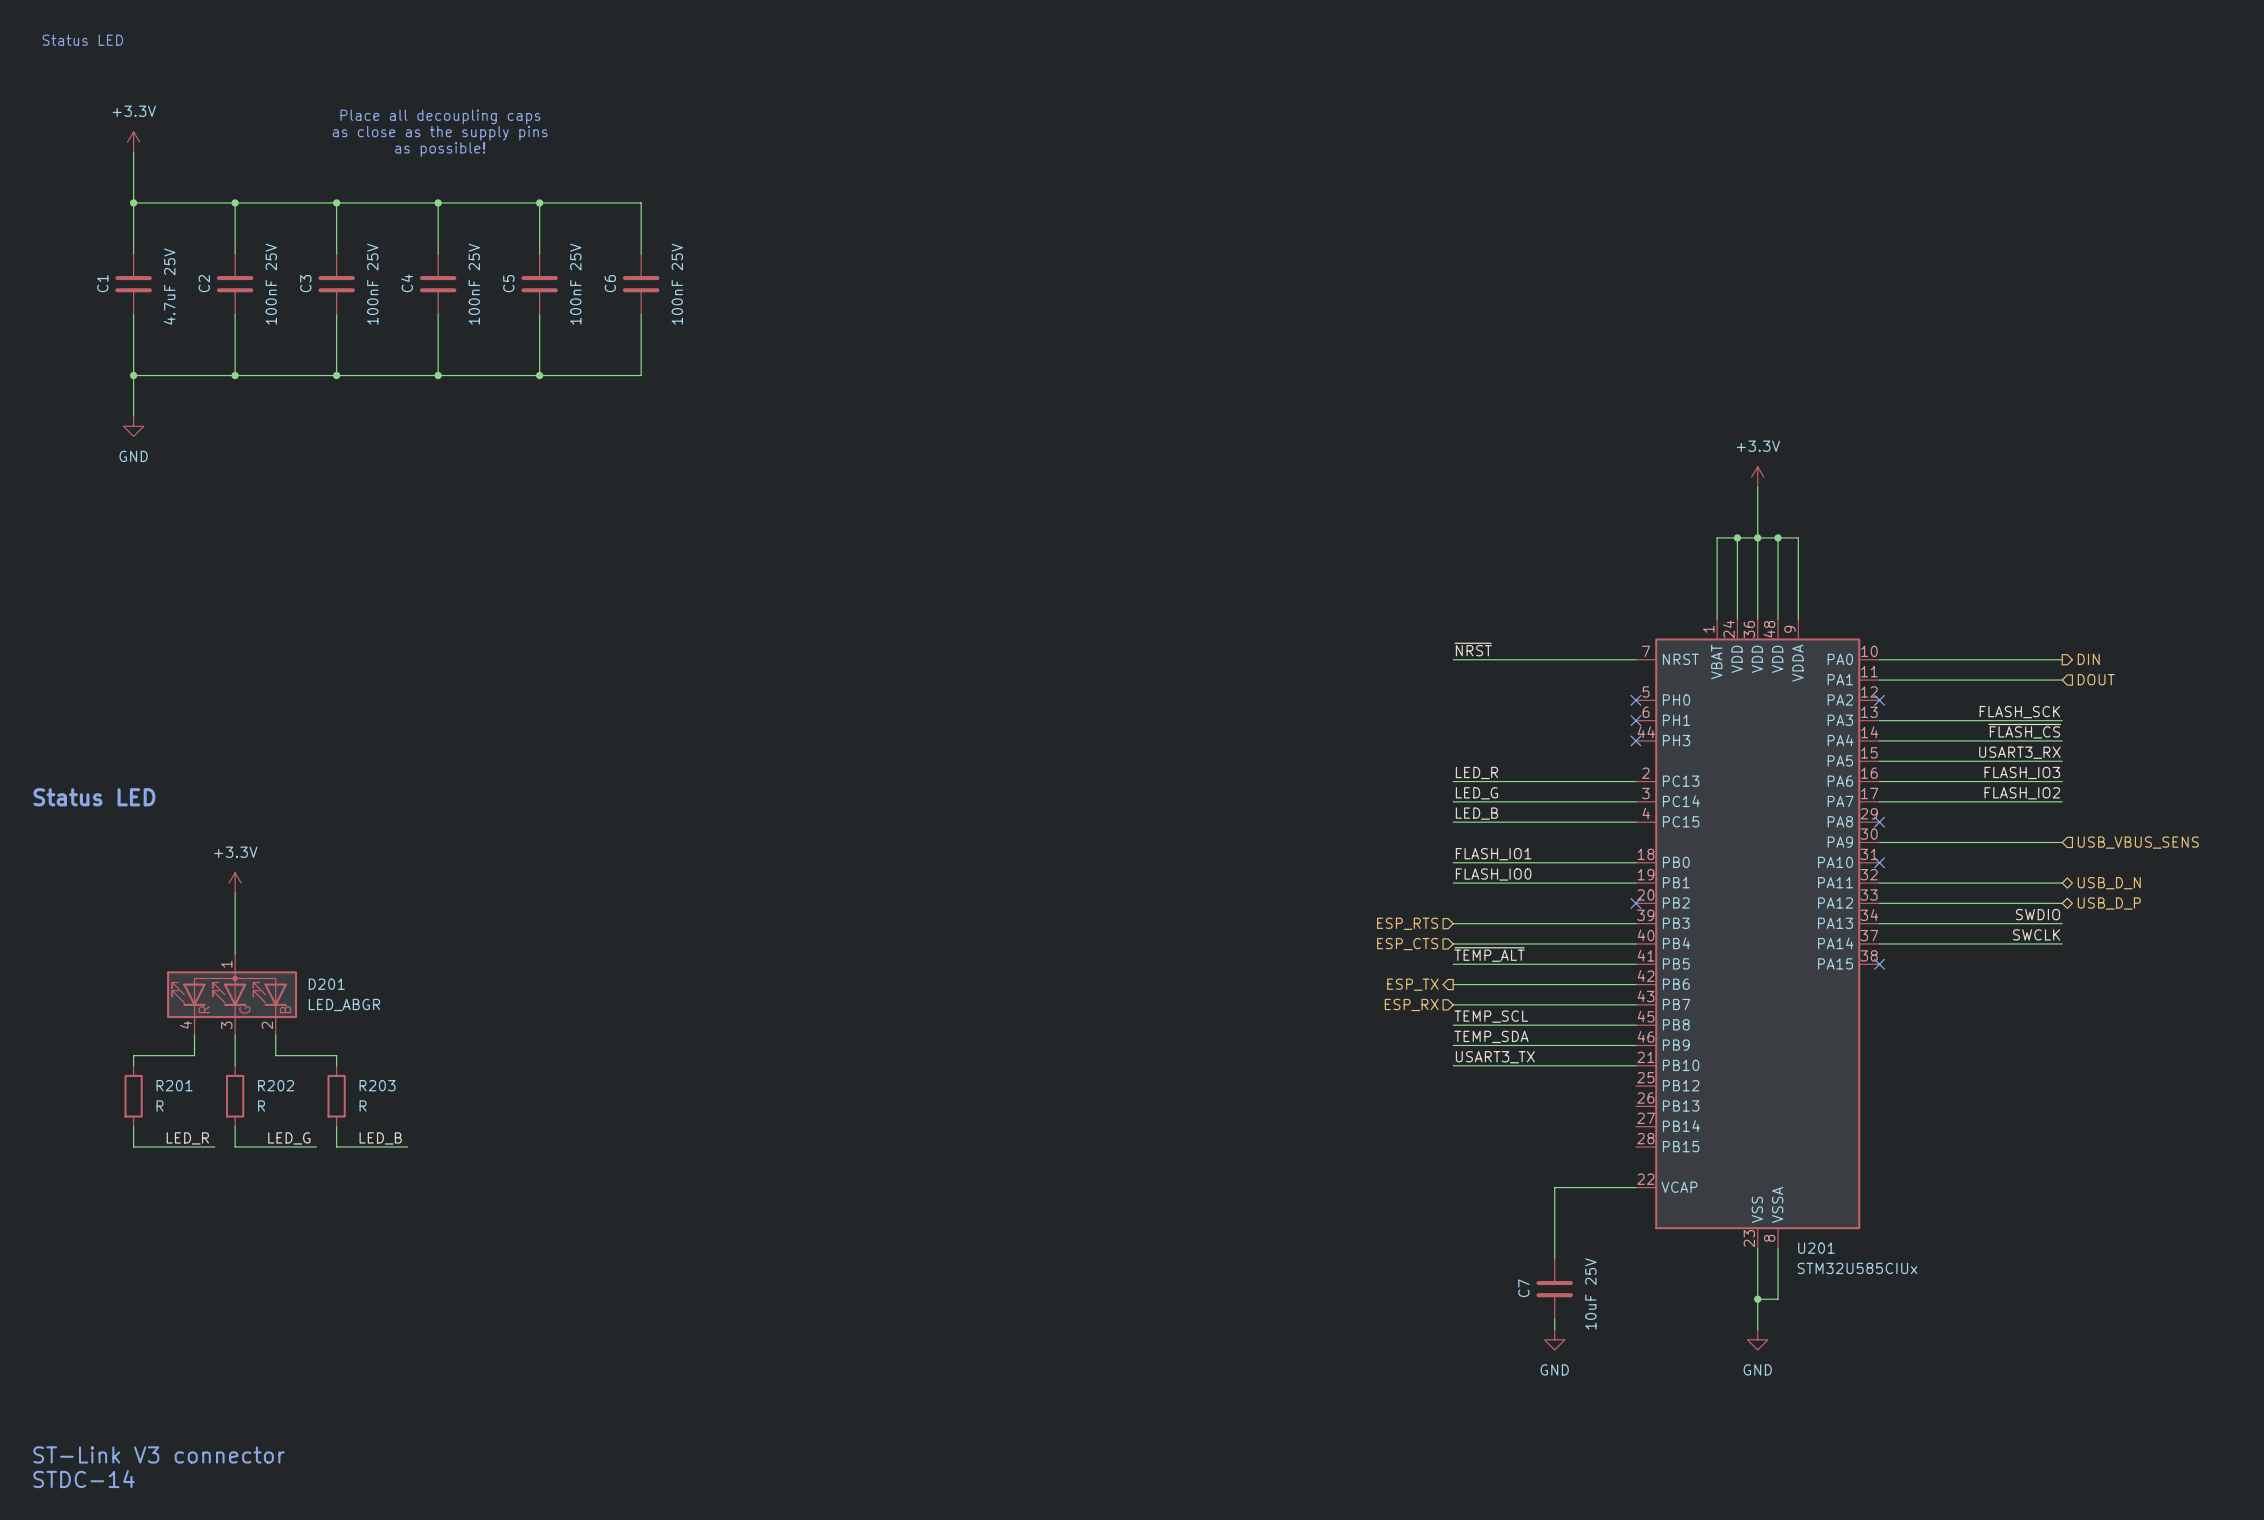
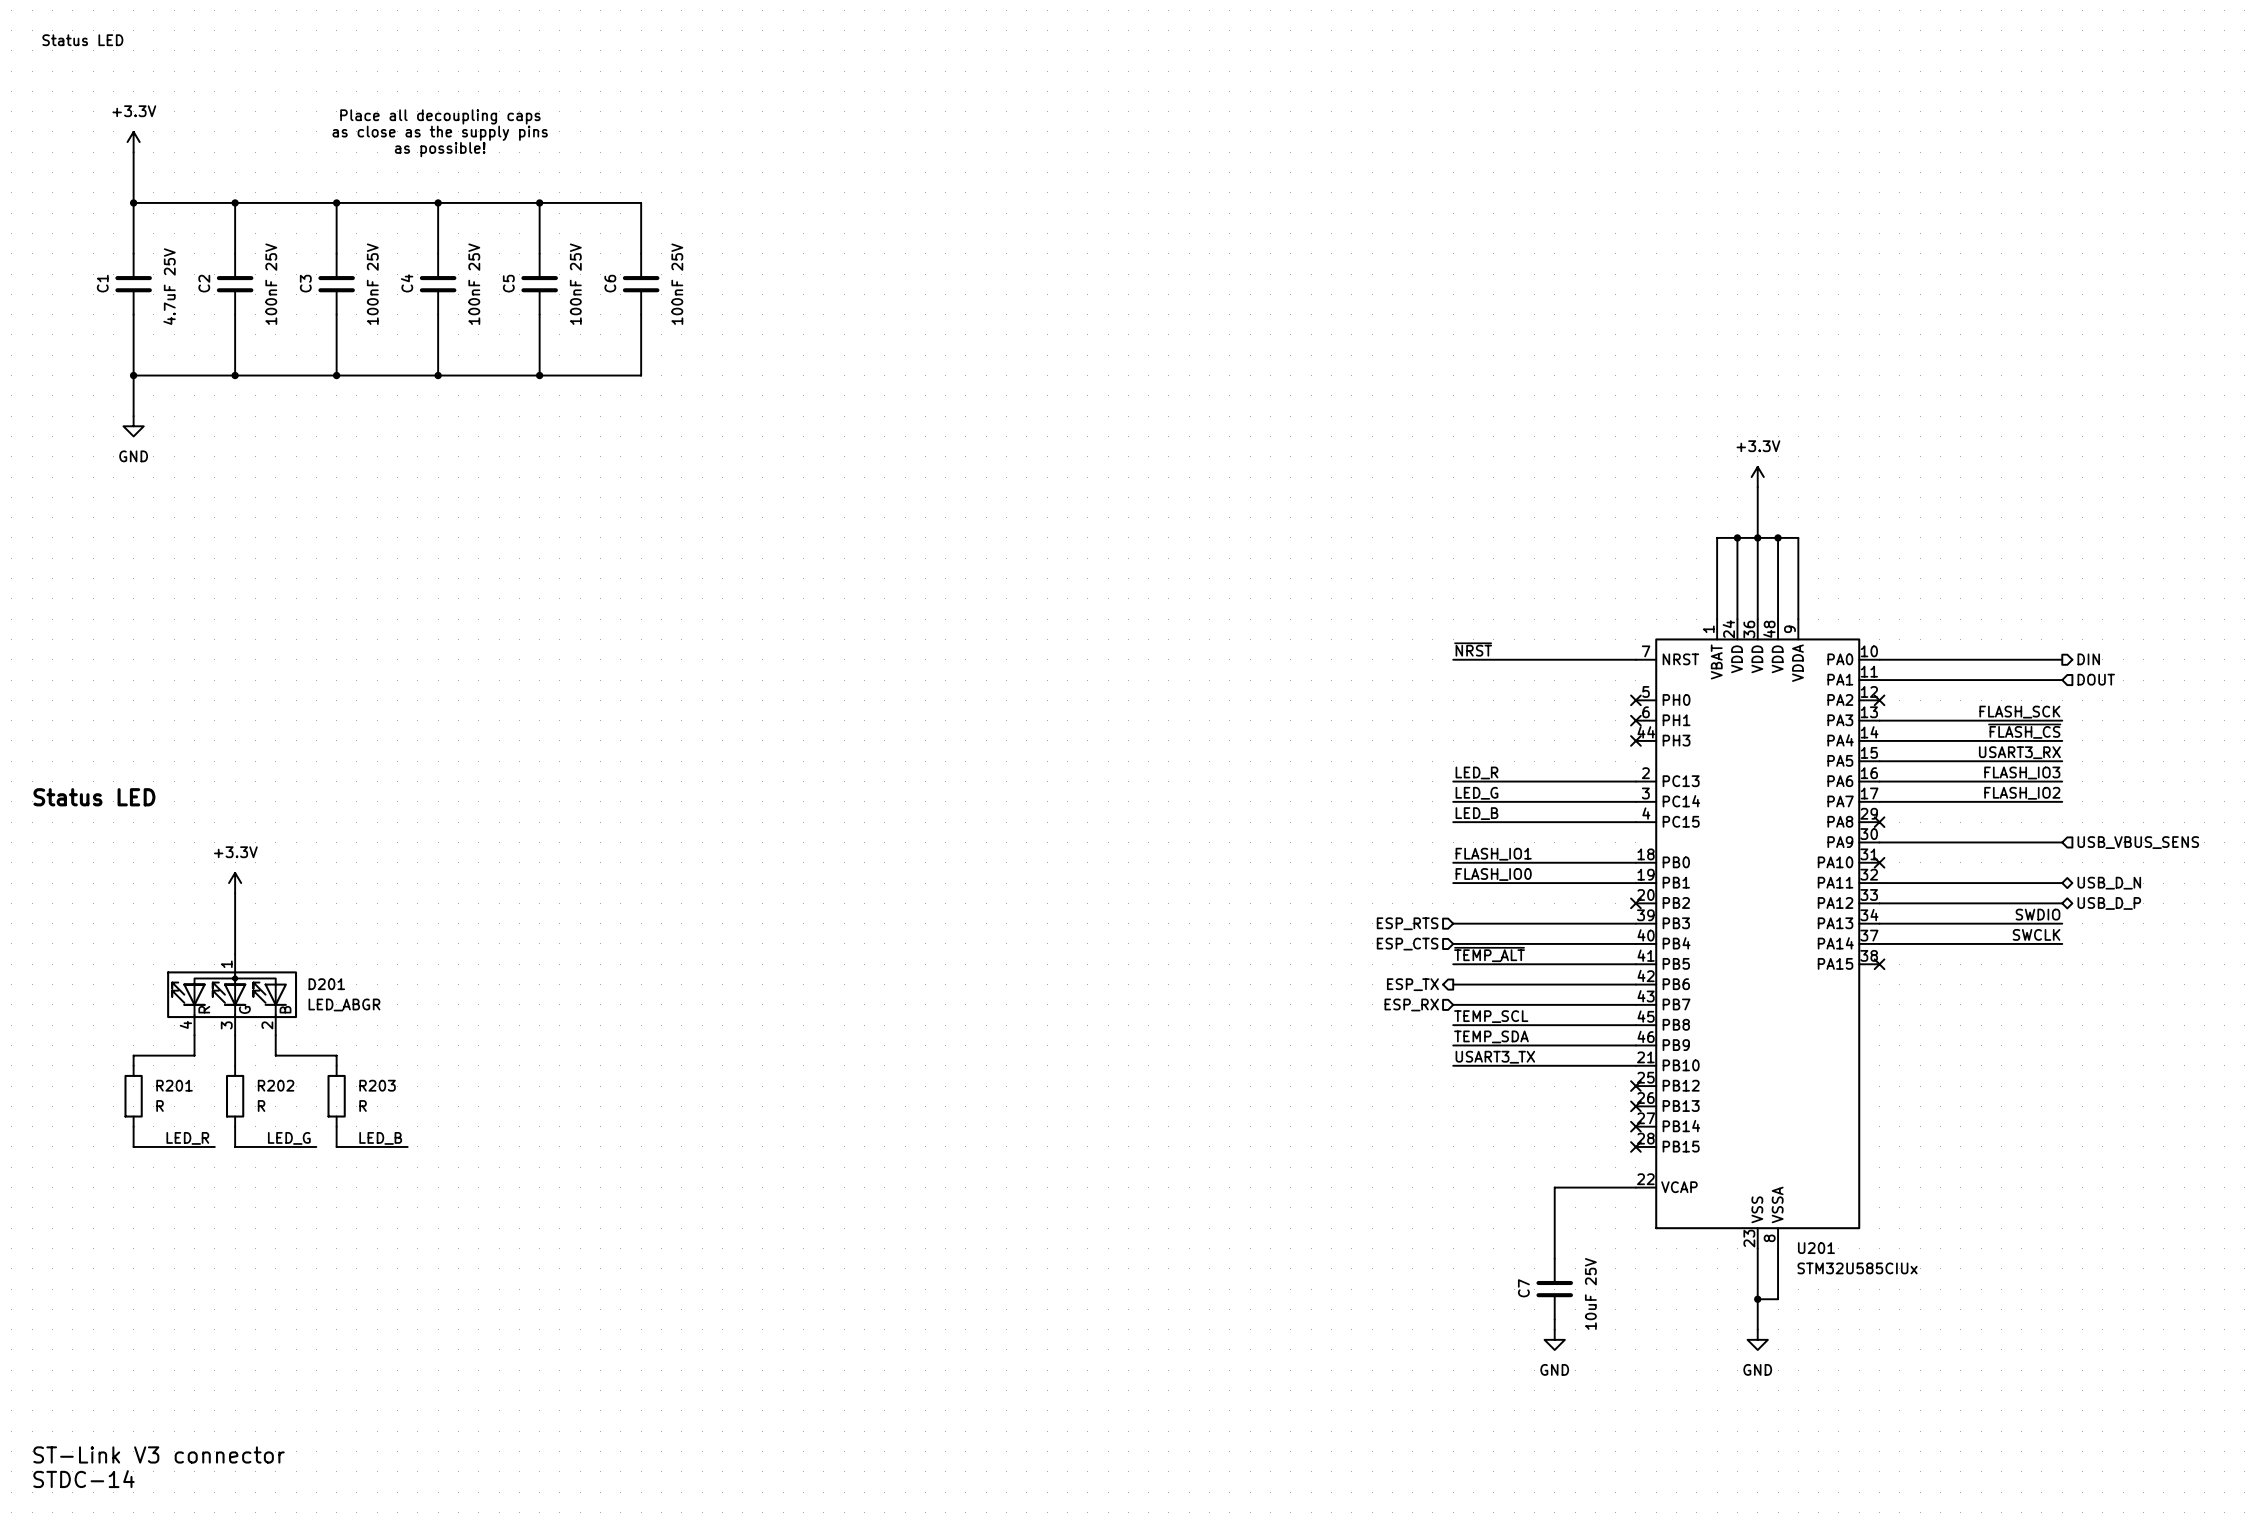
no-connect mark: none -> (1635, 1086)
no-connect mark: none -> (1635, 1106)
no-connect mark: none -> (1635, 1126)
no-connect mark: none -> (1635, 1146)

